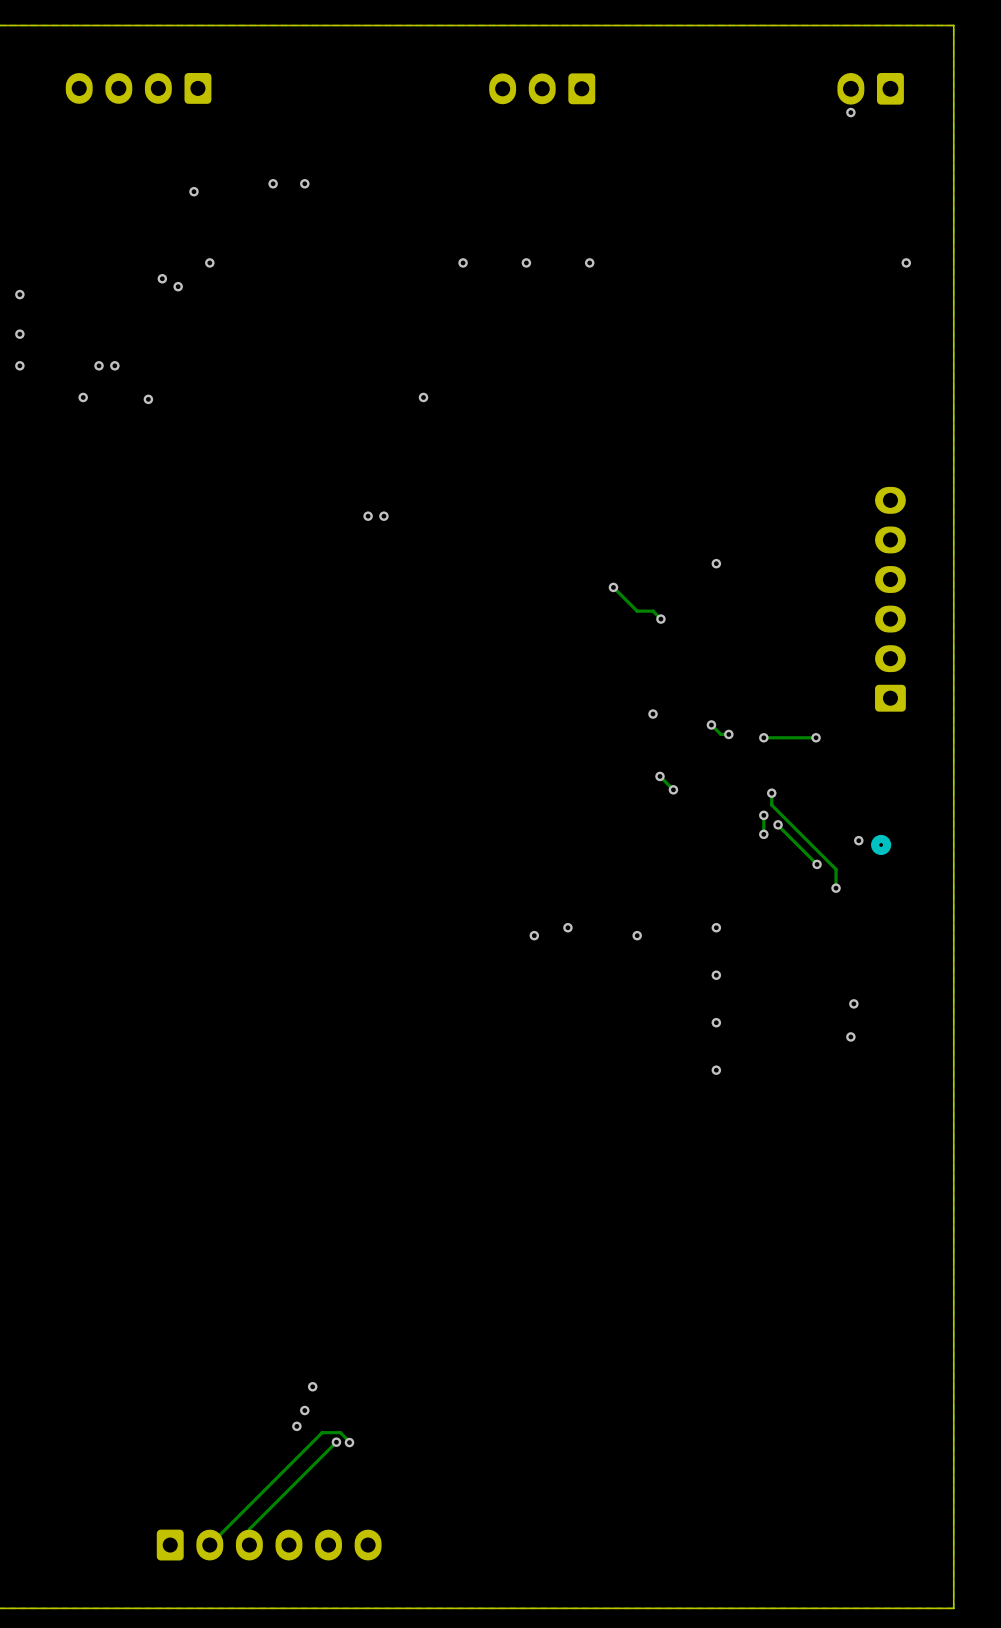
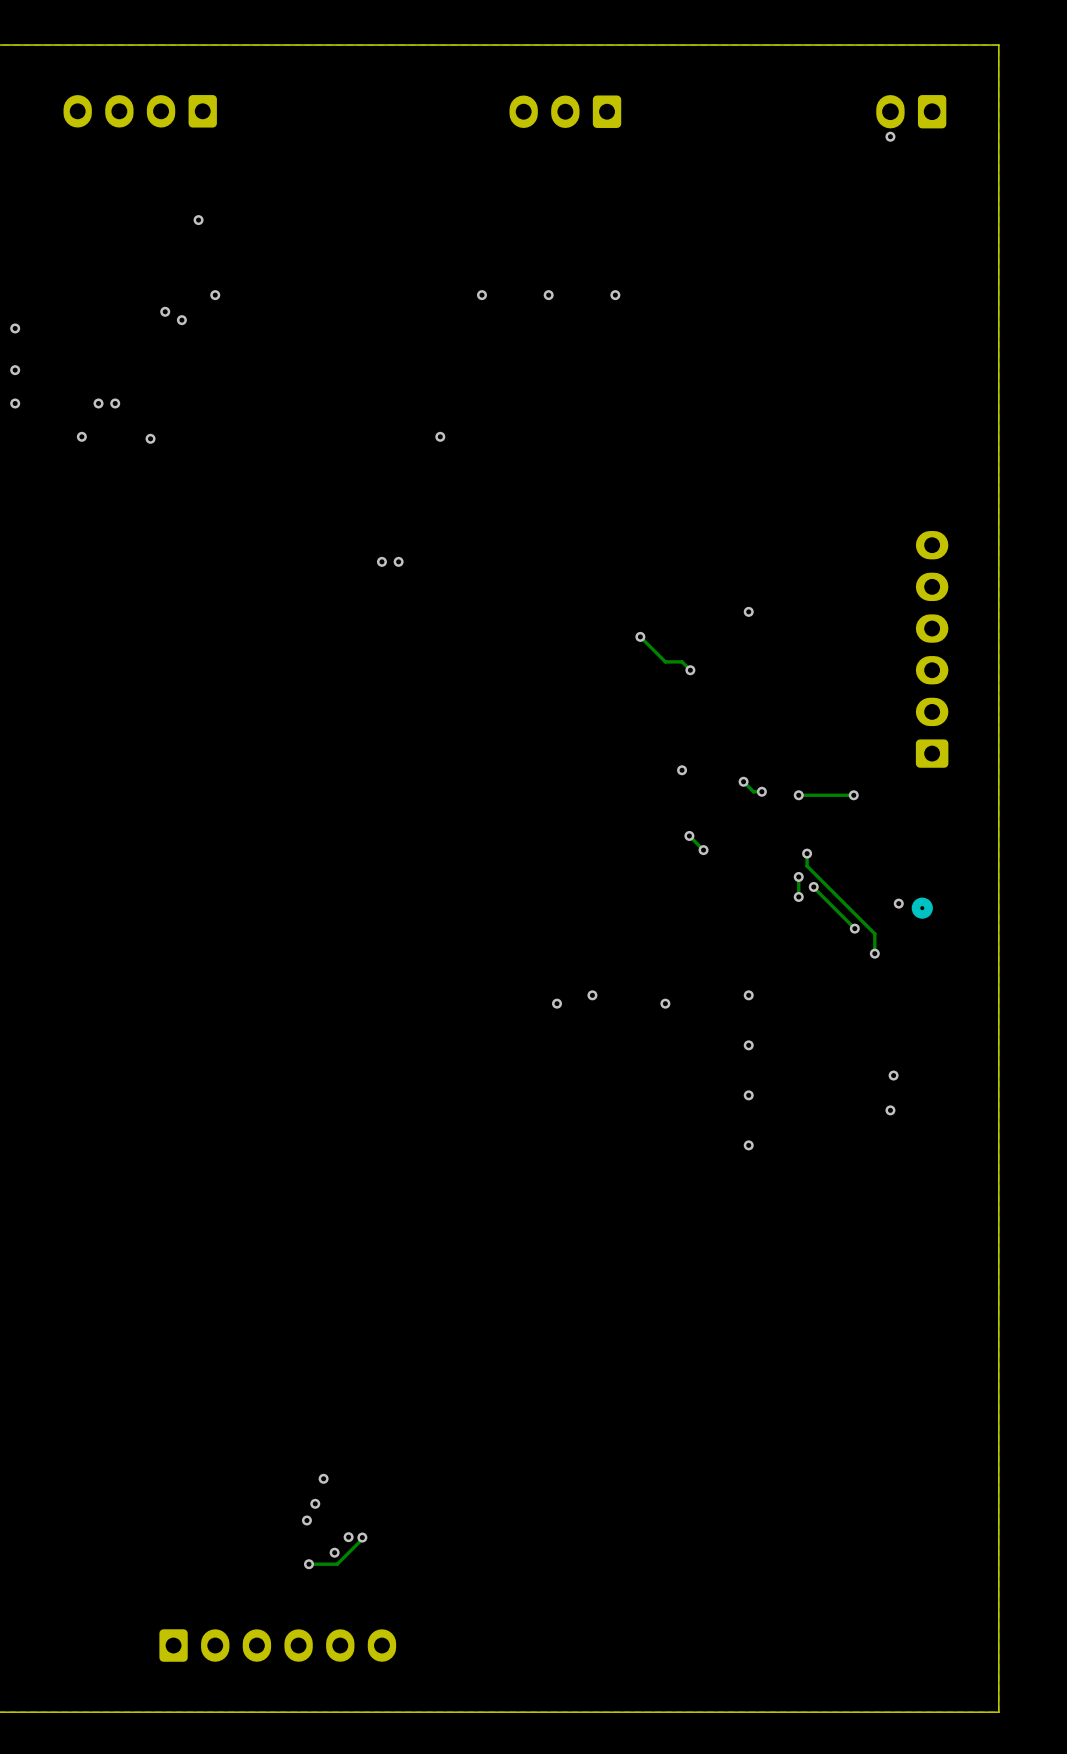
via: (273, 183) -> none
via: (304, 183) -> none
via: (906, 262) -> none
track: (336, 1442) (249, 1529) (249, 1545) -> none
track: (349, 1442) (340, 1432) (322, 1432) (209, 1545) -> none
track: none -> (360, 1539) (337, 1564) (308, 1564)
via: none -> (334, 1552)
via: none -> (308, 1564)

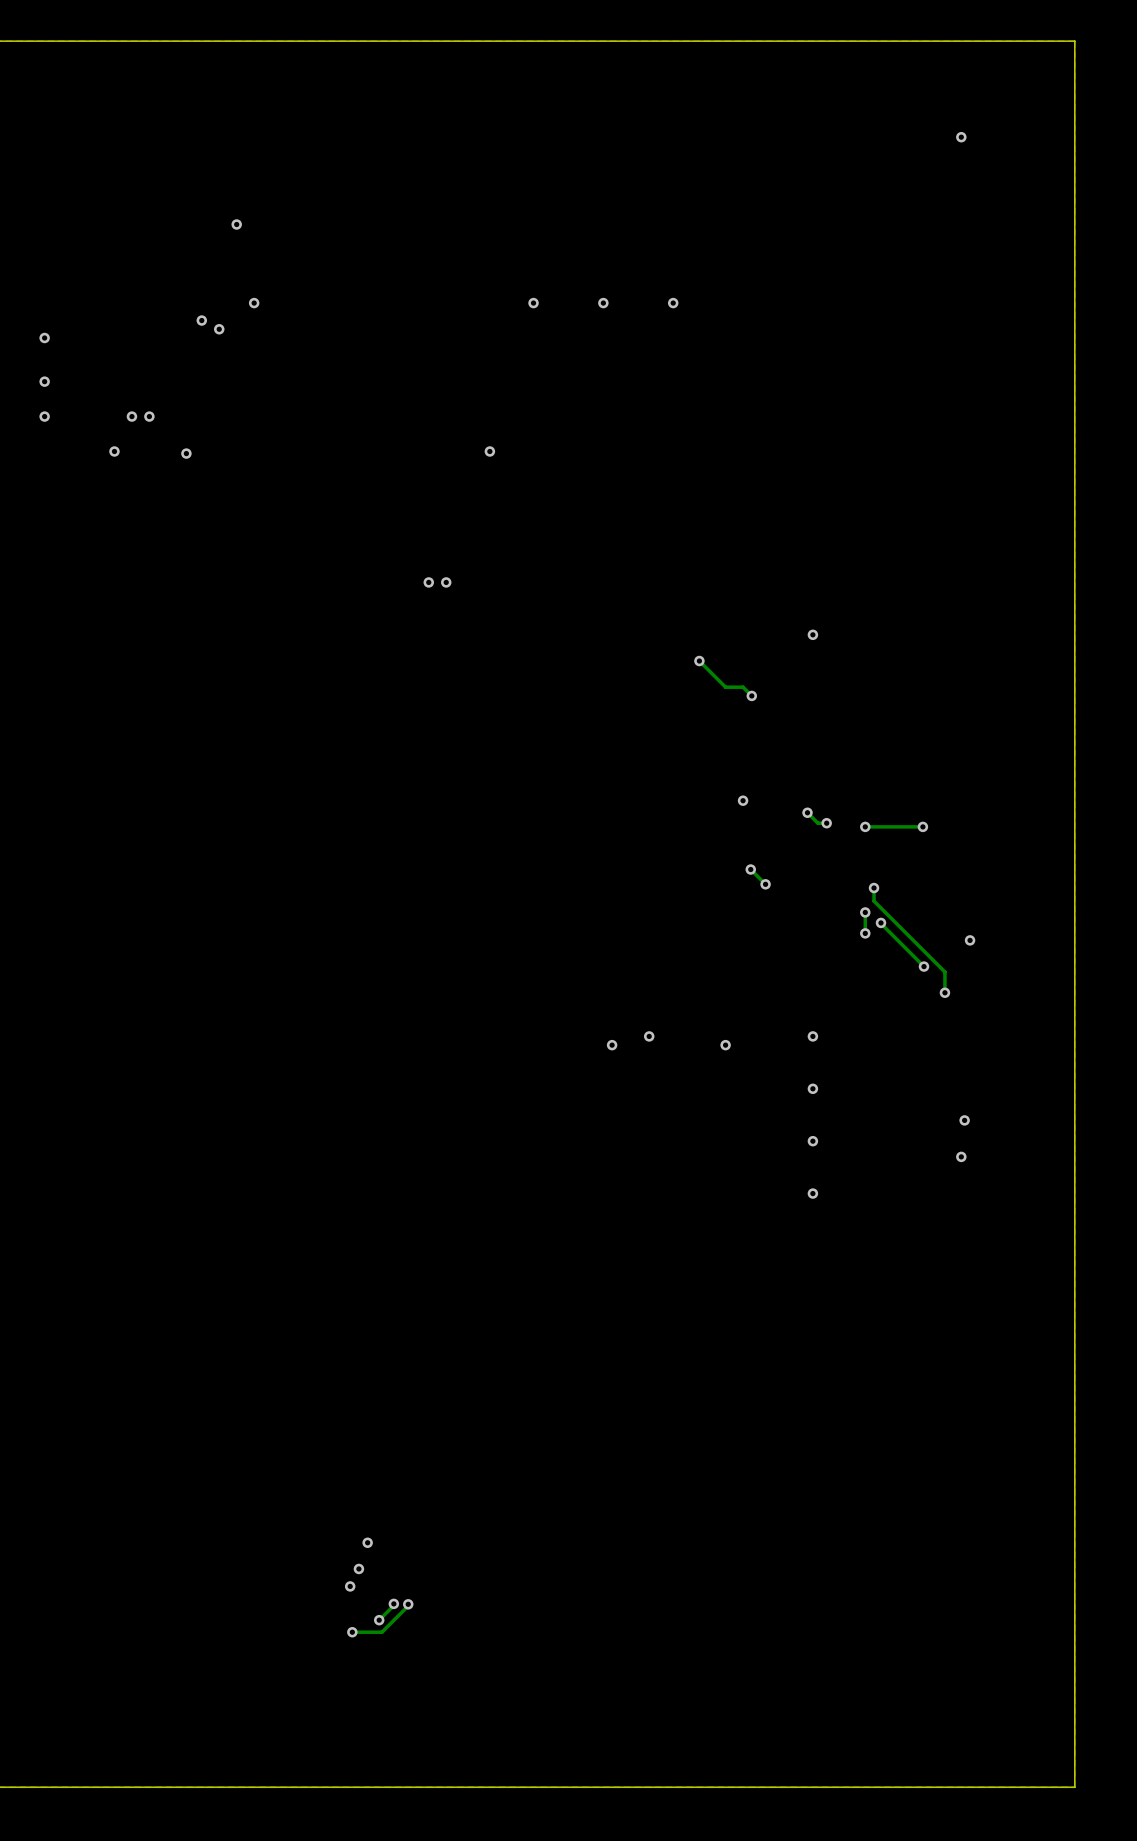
part: (140, 111) -> none
part: (565, 111) -> none
part: (911, 111) -> none
part: (932, 649) -> none
part: (922, 908) -> none
track: none -> (391, 1606) (379, 1620)
part: (277, 1645) -> none

